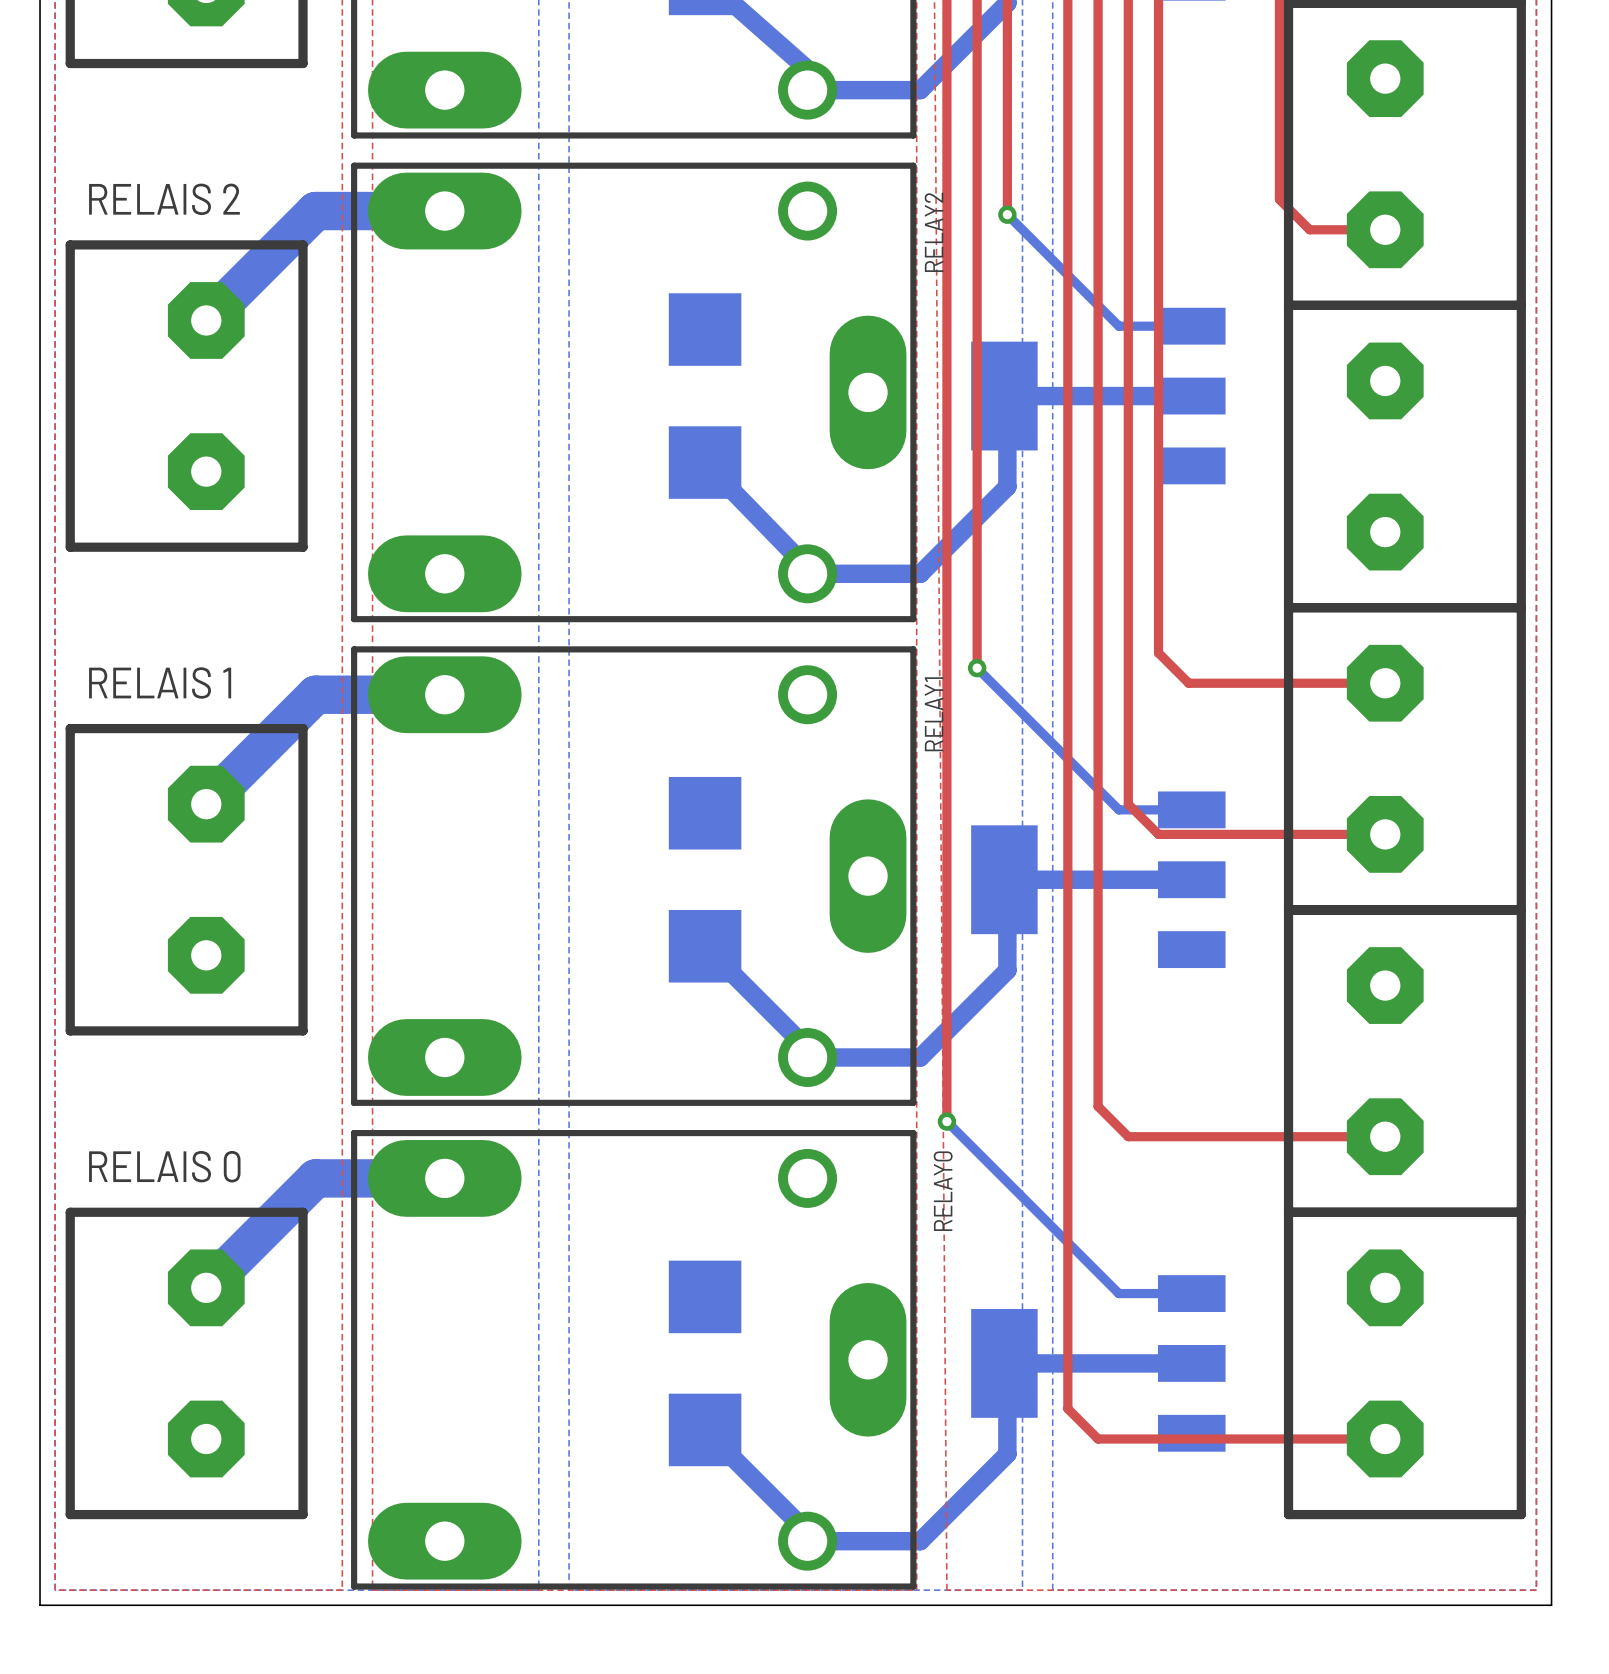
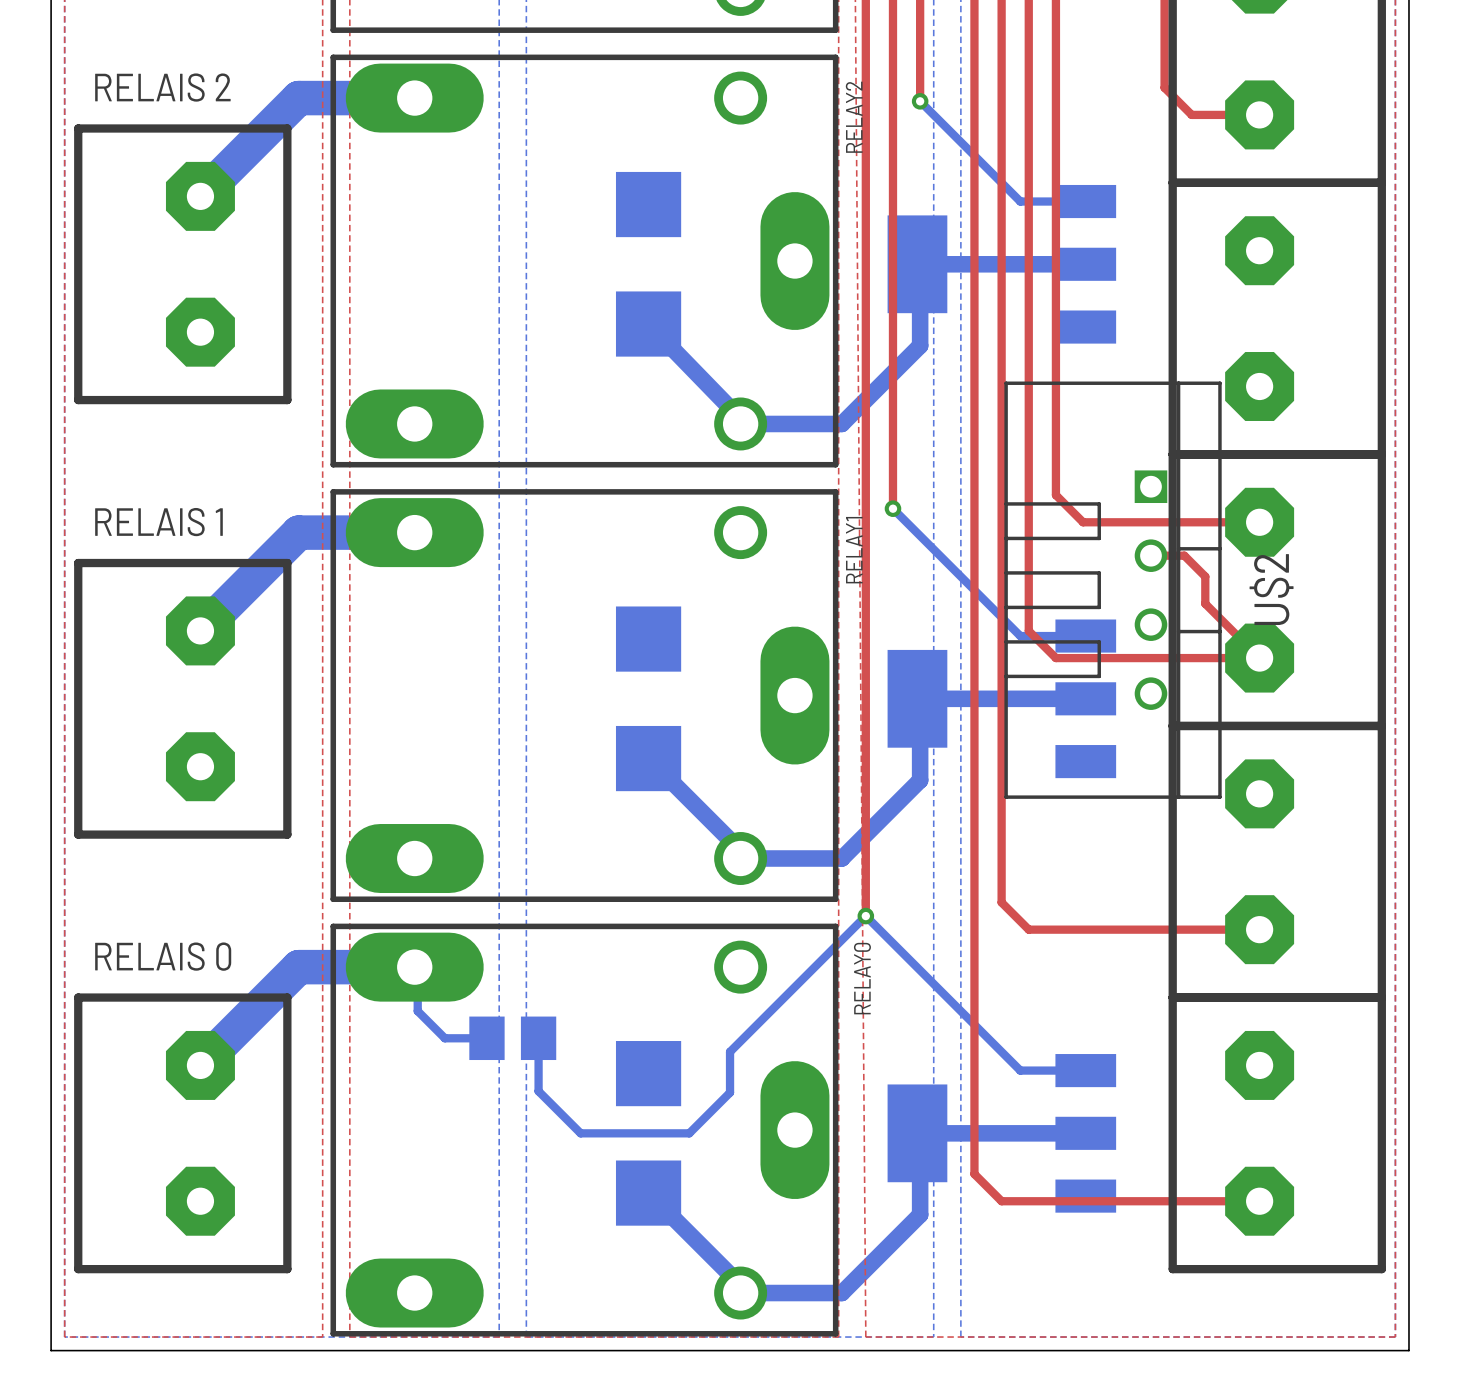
top track: none -> (1150, 555) (1184, 555) (1205, 576) (1205, 603) (1259, 658)
U$2: none -> (1113, 590)
bottom track: none -> (865, 916) (730, 1051) (730, 1092) (689, 1133) (580, 1133) (538, 1091) (538, 1038)
bottom track: none -> (414, 967) (417, 970) (417, 1011) (444, 1038) (486, 1038)
part: none -> (512, 1038)

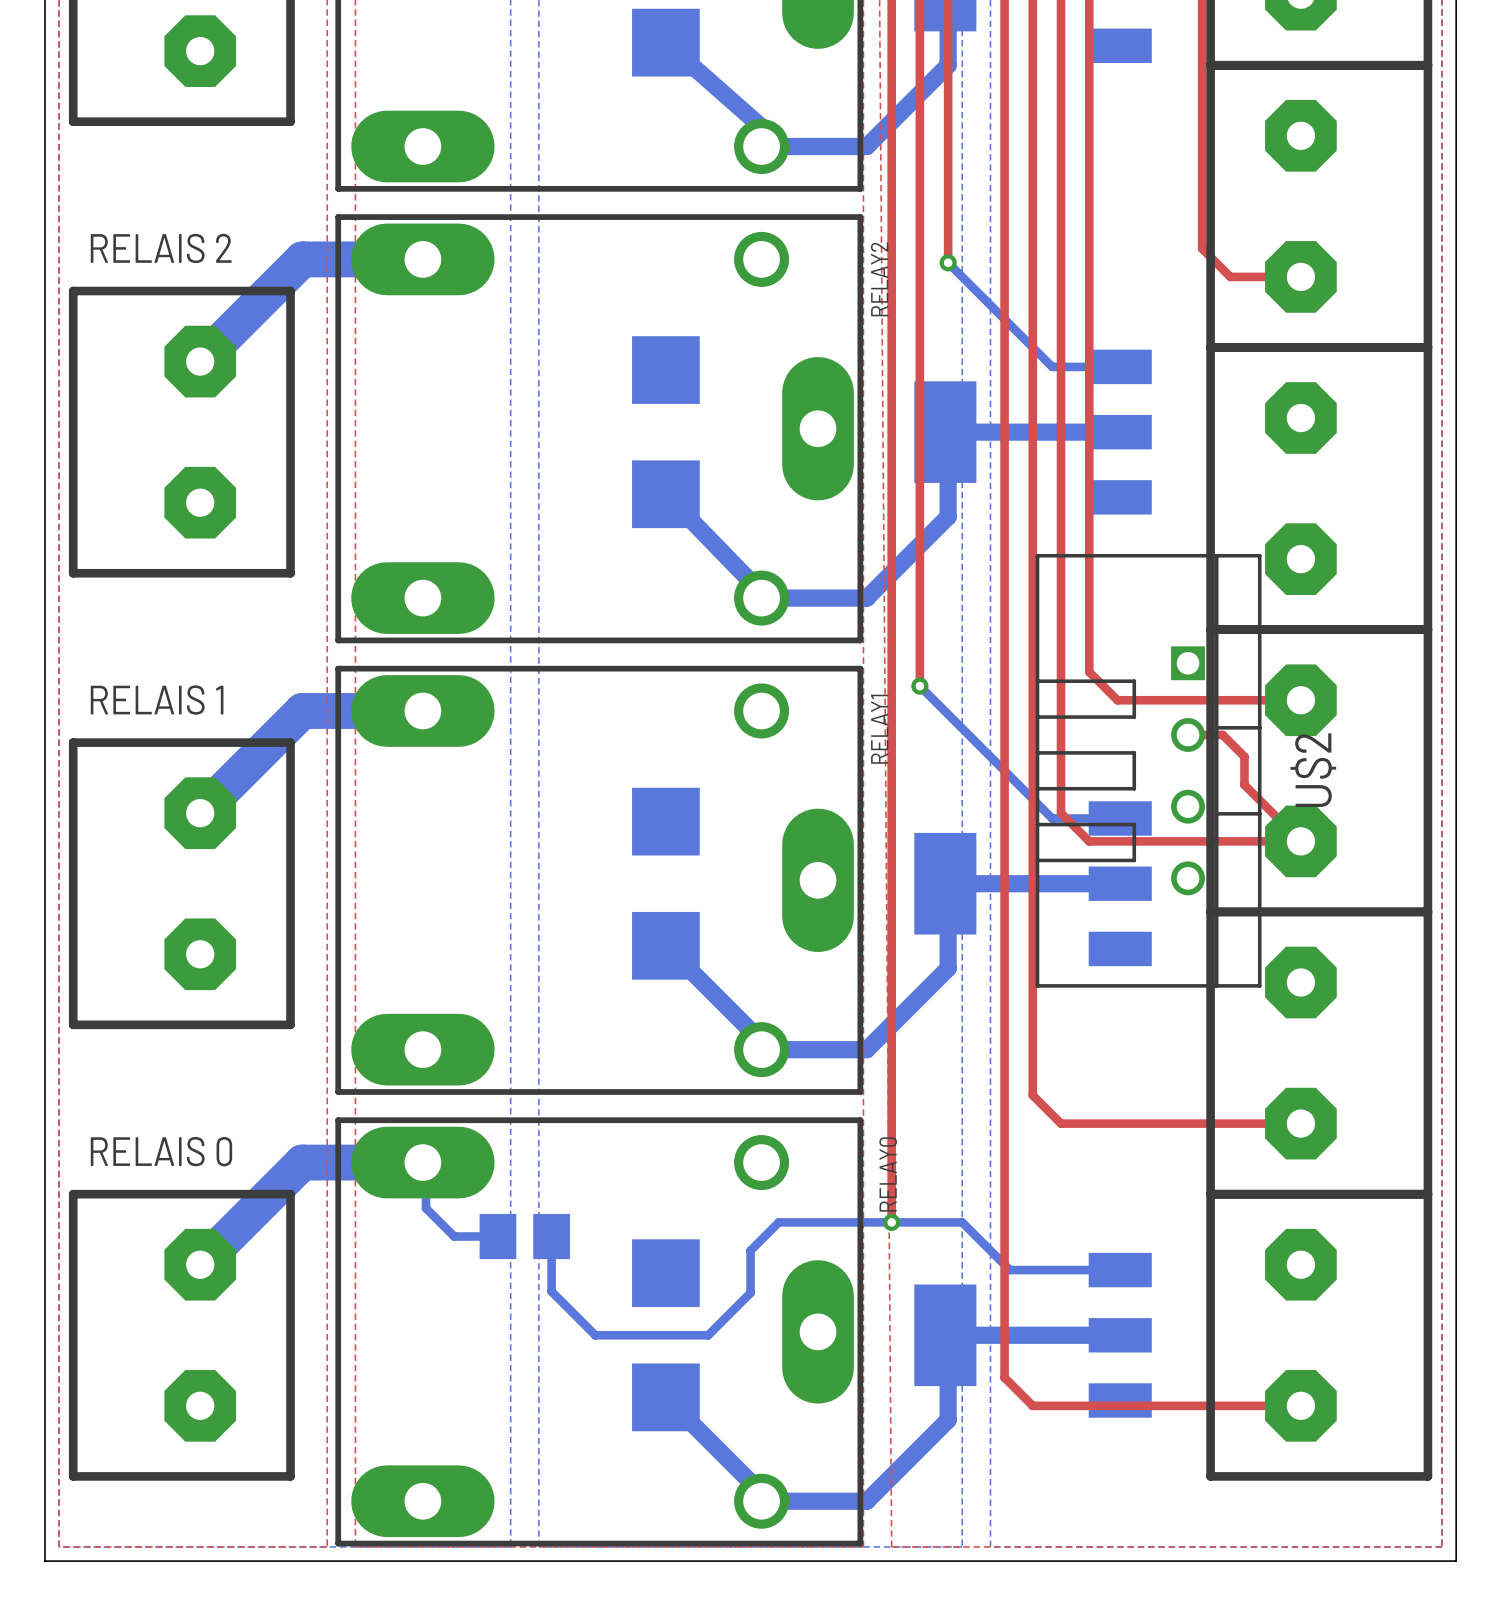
top track: none -> (891, 1109) (891, 1222)
via position: (865, 916) -> (891, 1222)
bottom track: (757, 1024) (865, 916) (1020, 1070) -> (778, 1222) (962, 1222) (1009, 1270) (1052, 1270)

